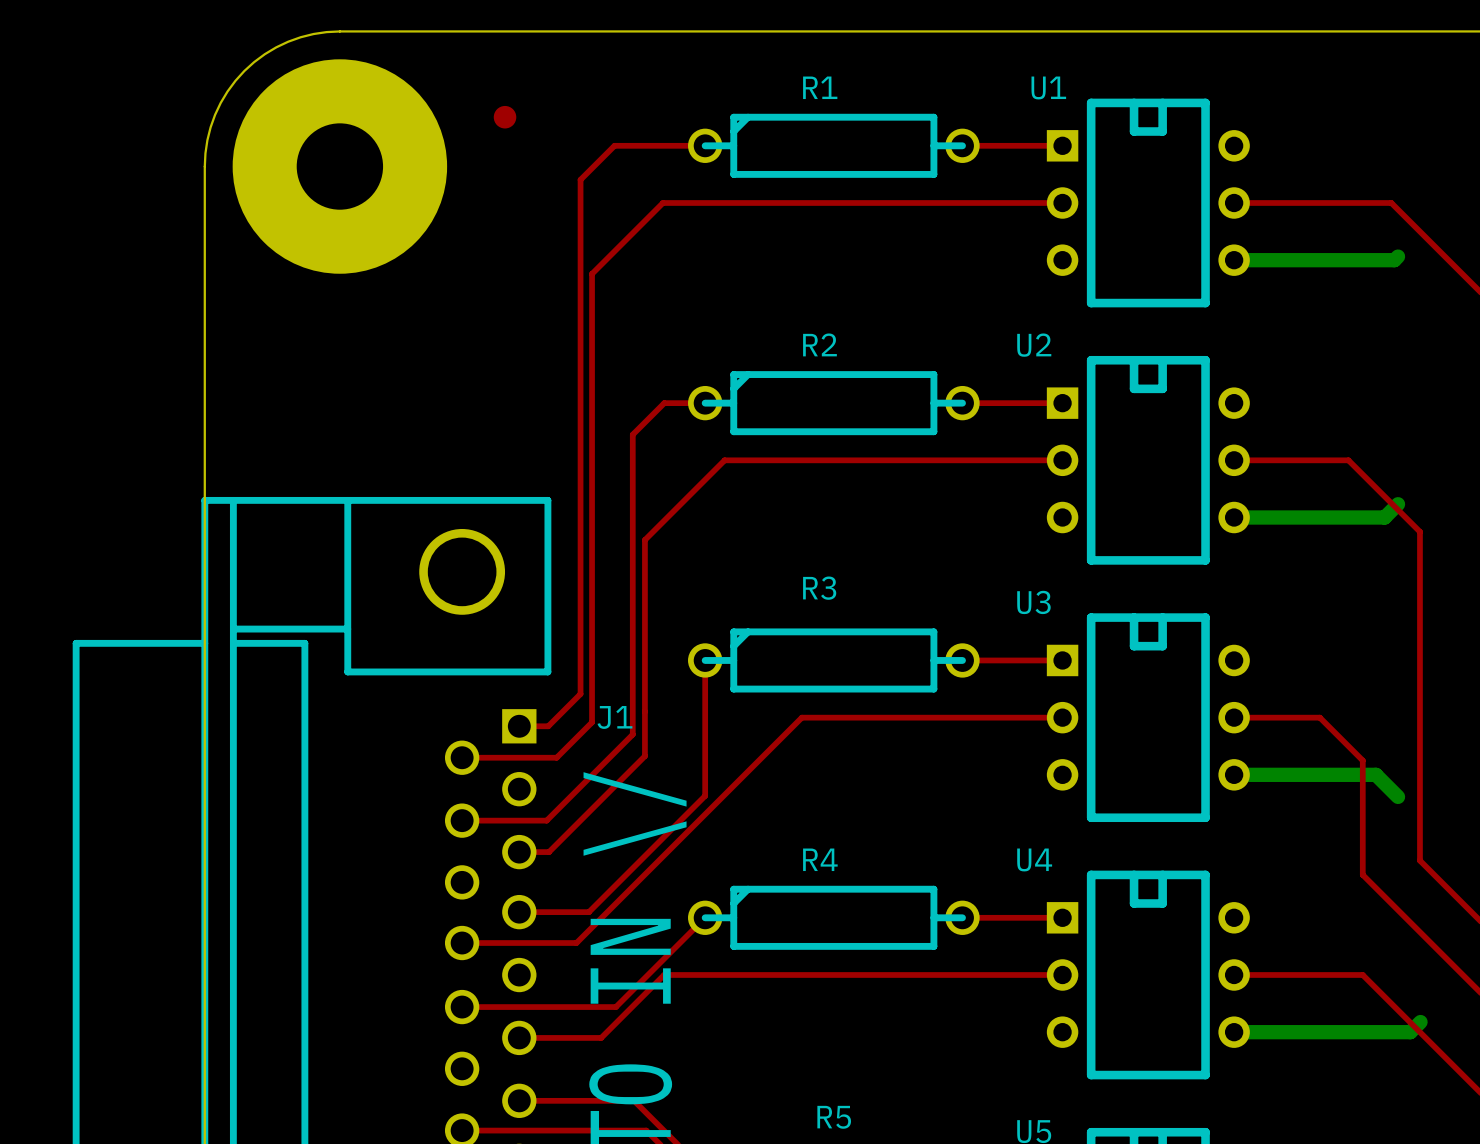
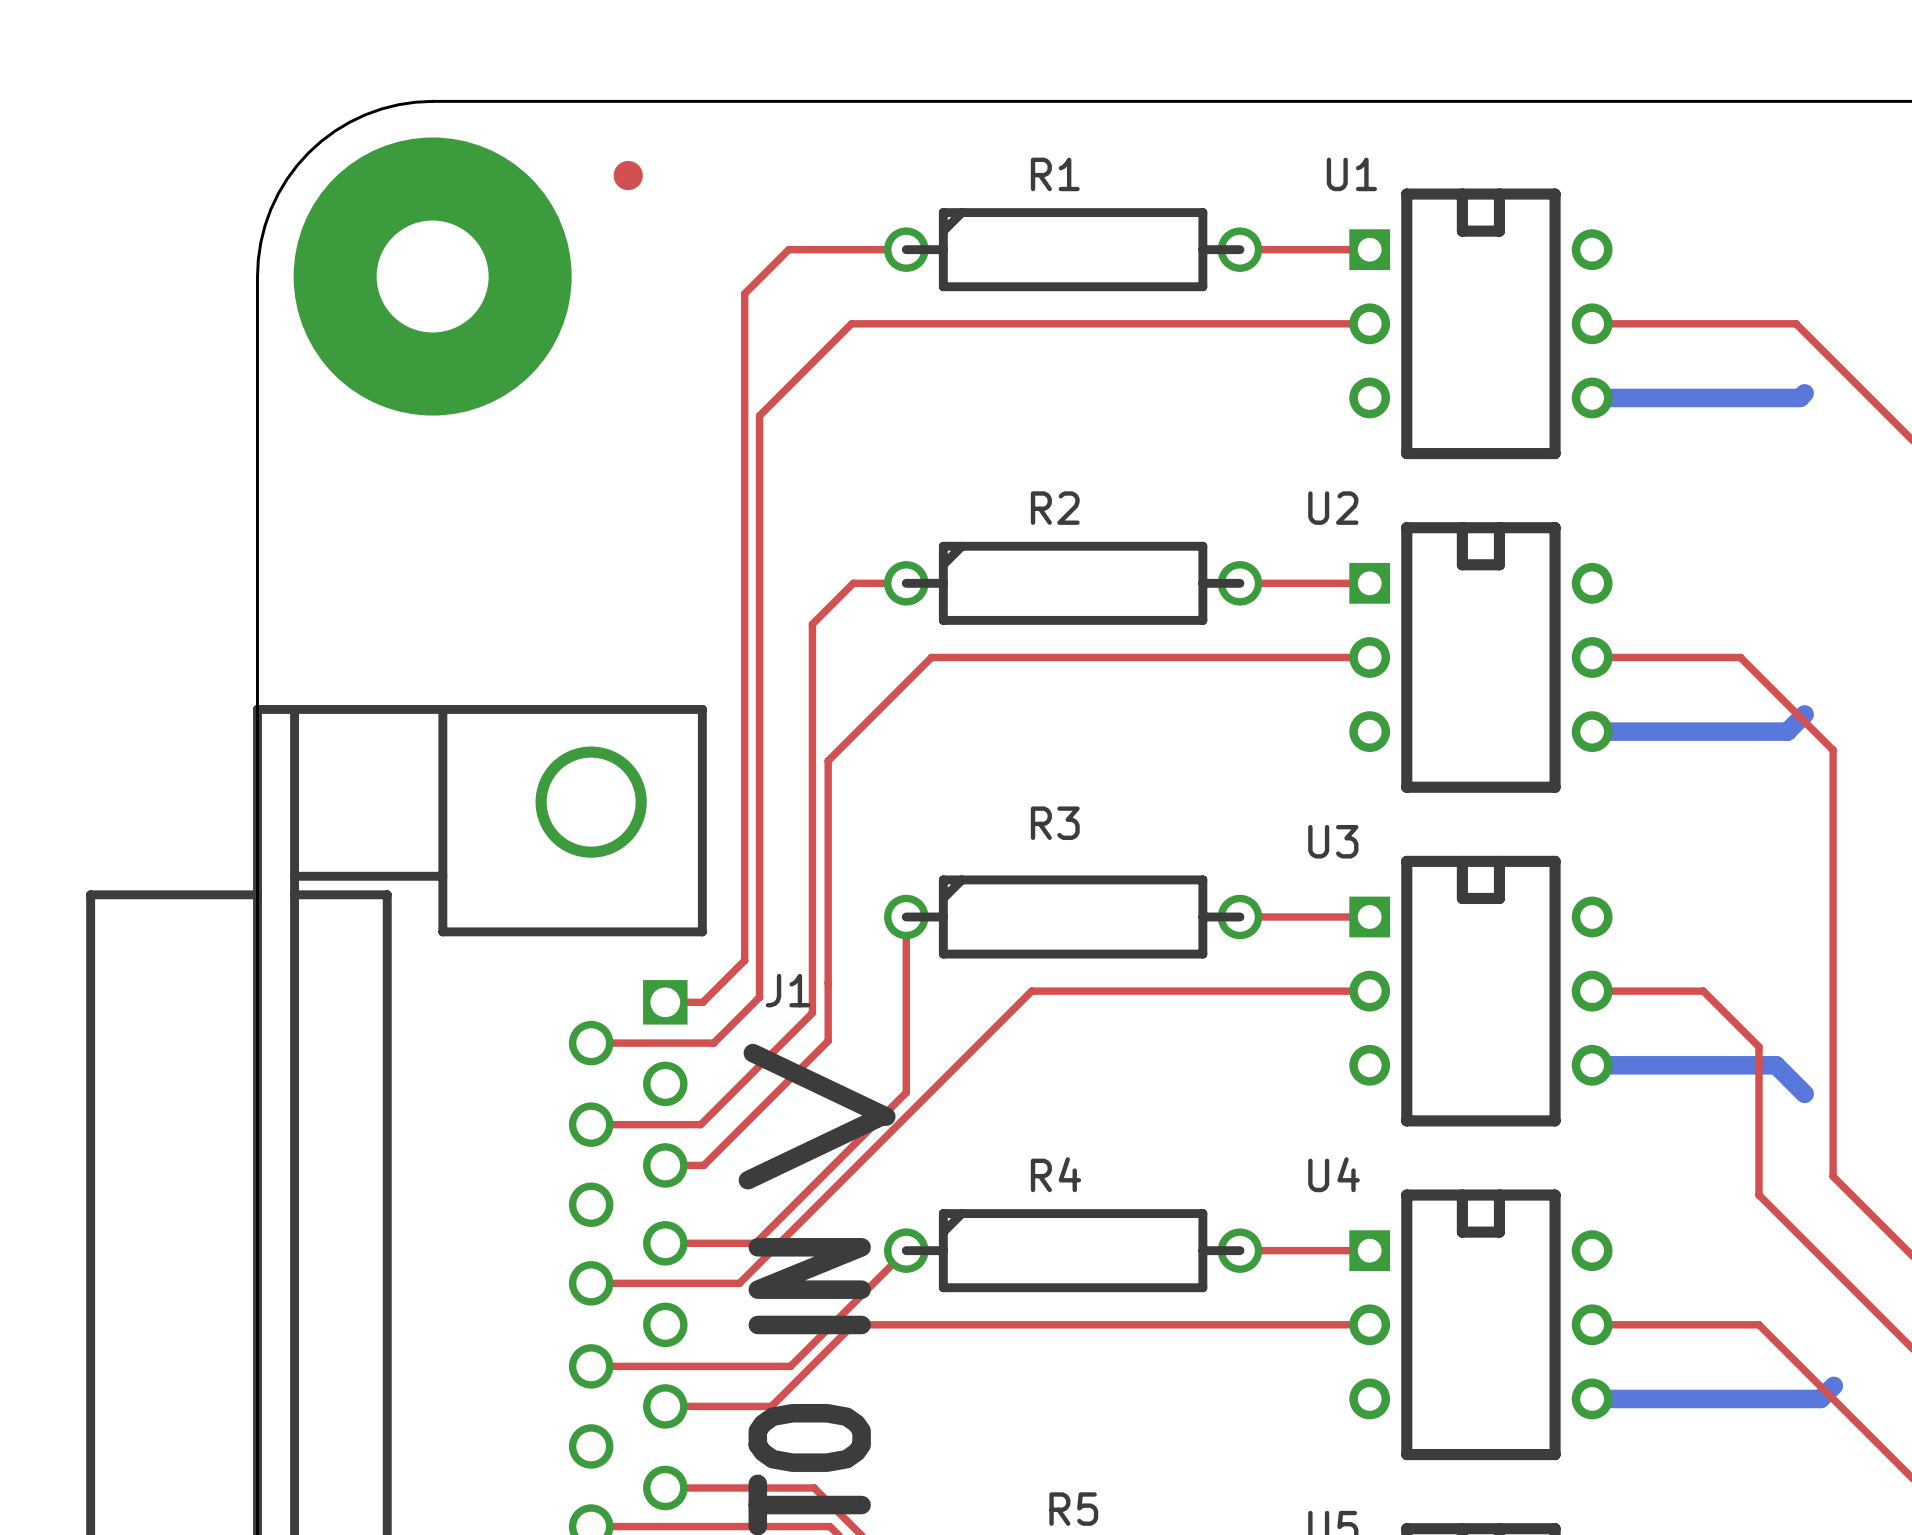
part position: (505, 117) -> (628, 175)

